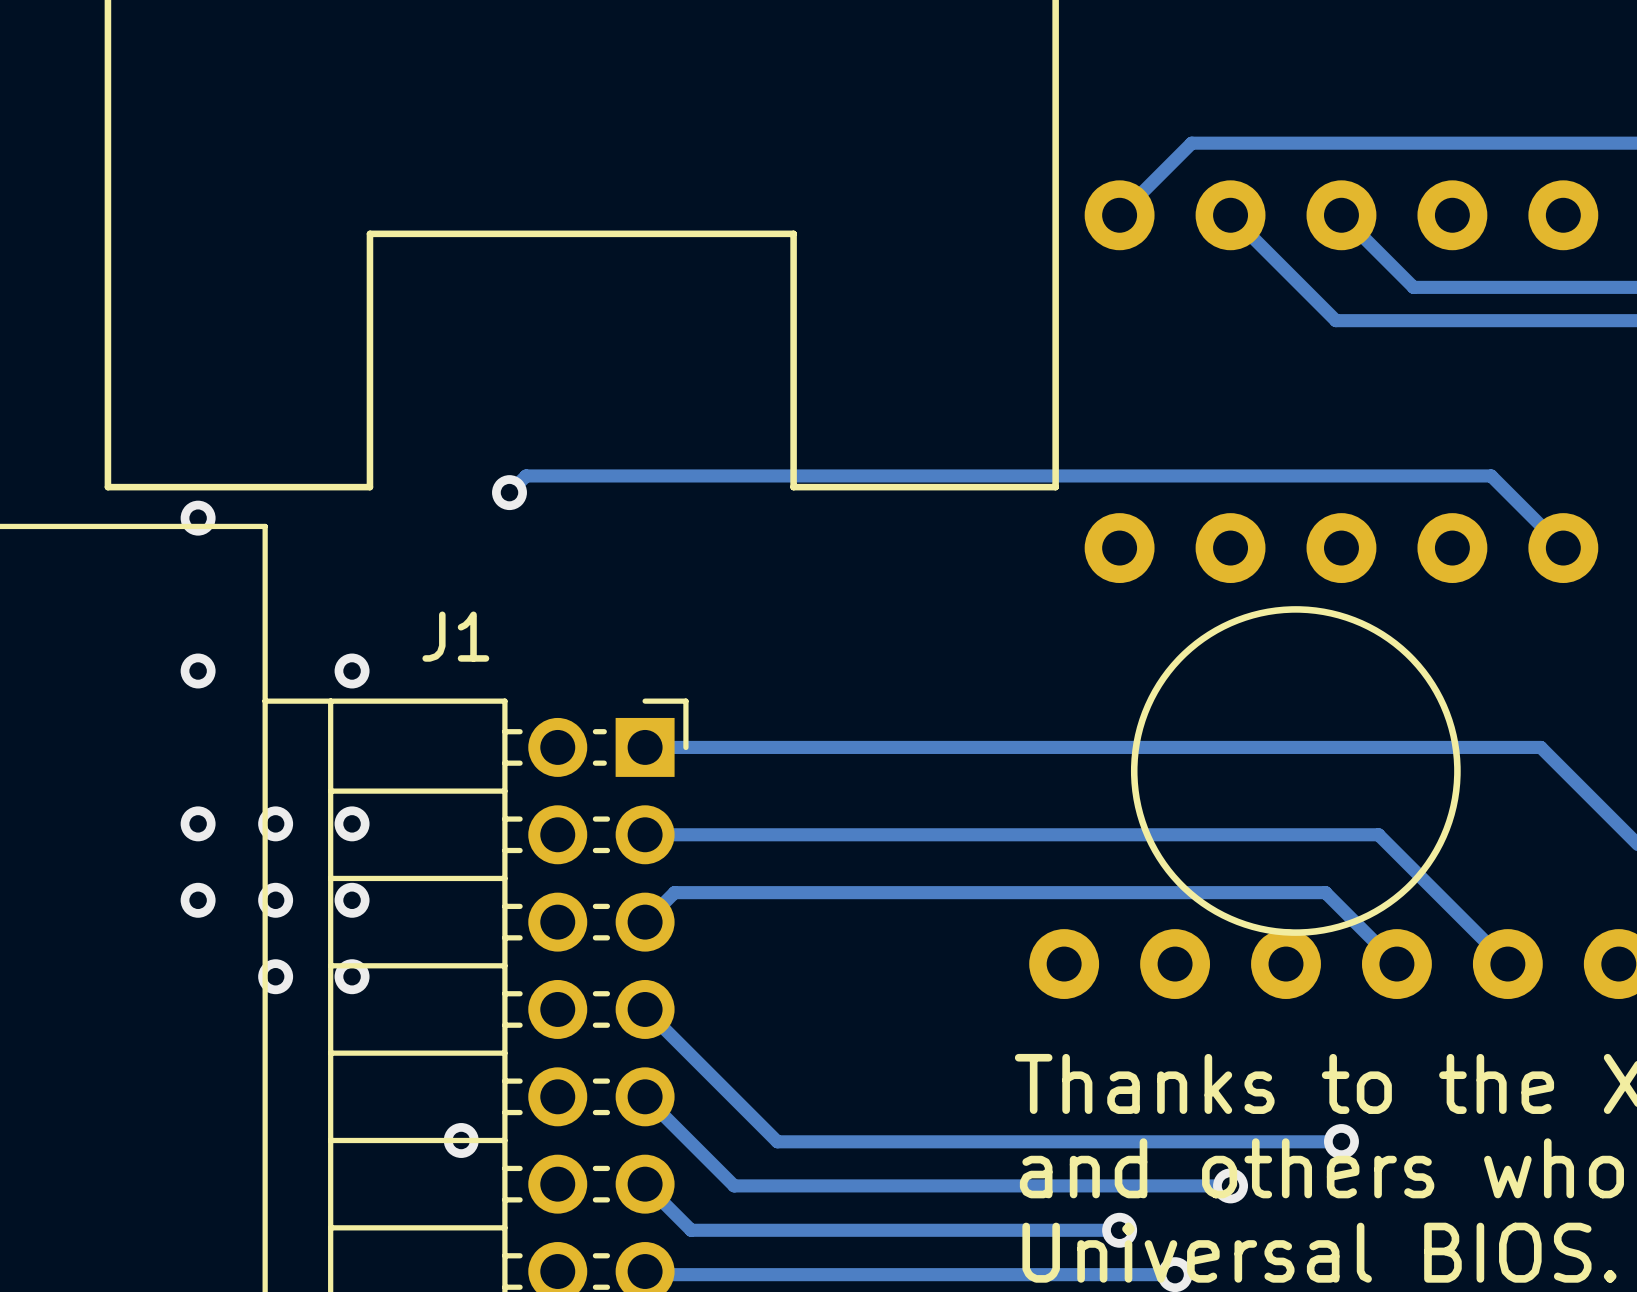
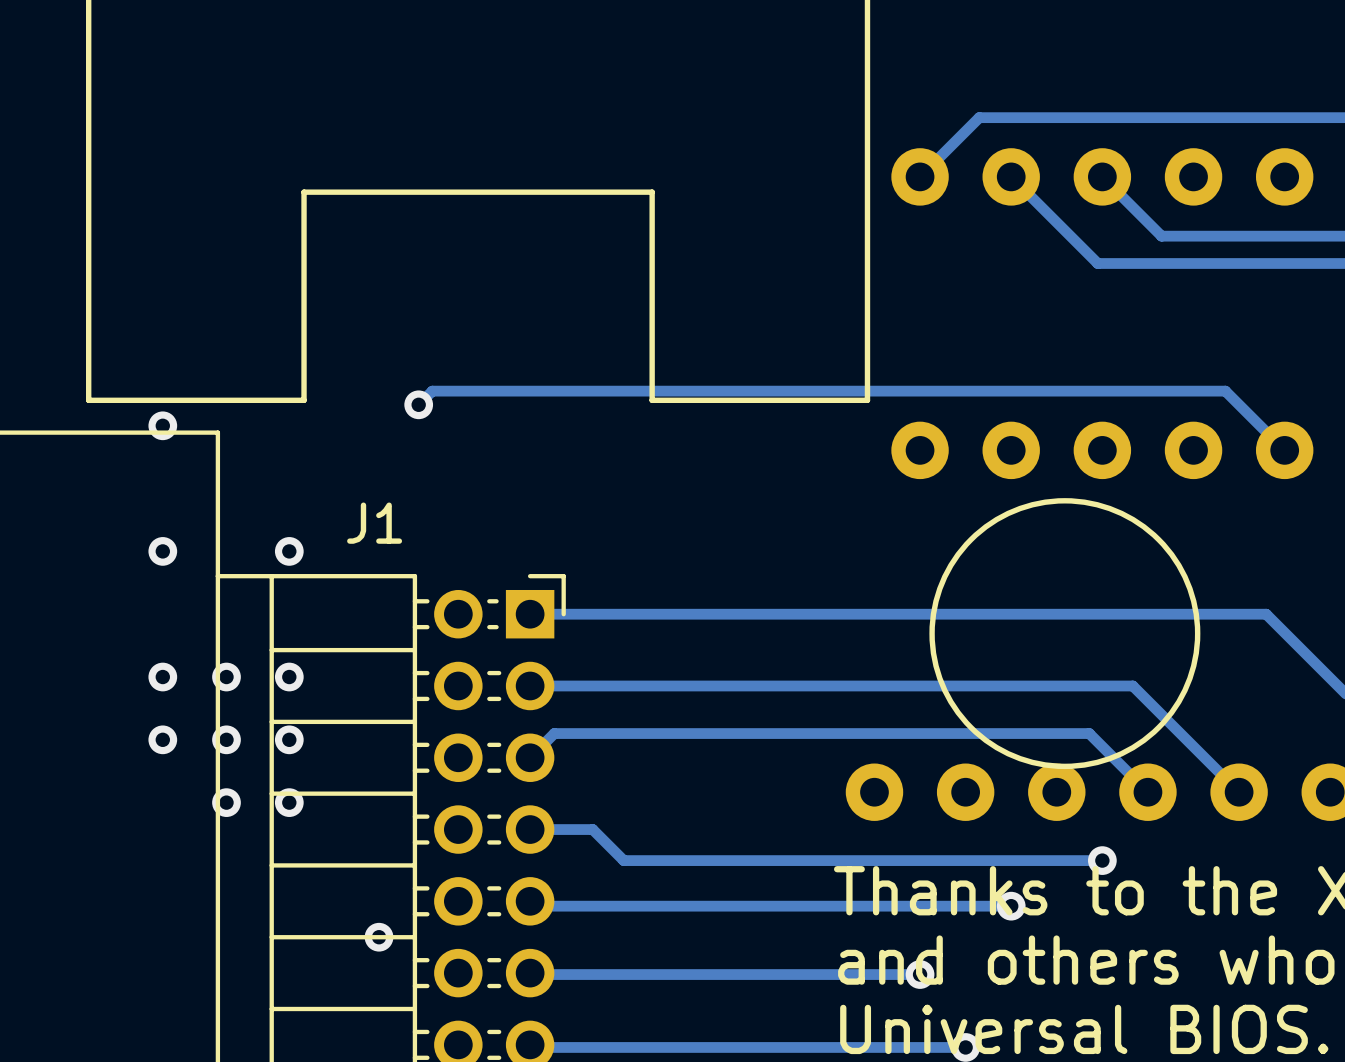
track: (645, 1009) (777, 1141) (1341, 1141) -> (530, 829) (592, 829) (623, 860) (1102, 860)
via: none -> (1102, 860)
track: (651, 1102) (734, 1185) -> (531, 974) (603, 974)
track: none -> (1011, 906) (534, 906)
via: none -> (1011, 906)
via: (1341, 1141) -> none
track: (646, 1185) (691, 1230) (1119, 1230) -> none
track: (1230, 1185) (1119, 1185) -> none
via: (1230, 1185) -> none
via position: (1119, 1230) -> (920, 974)

